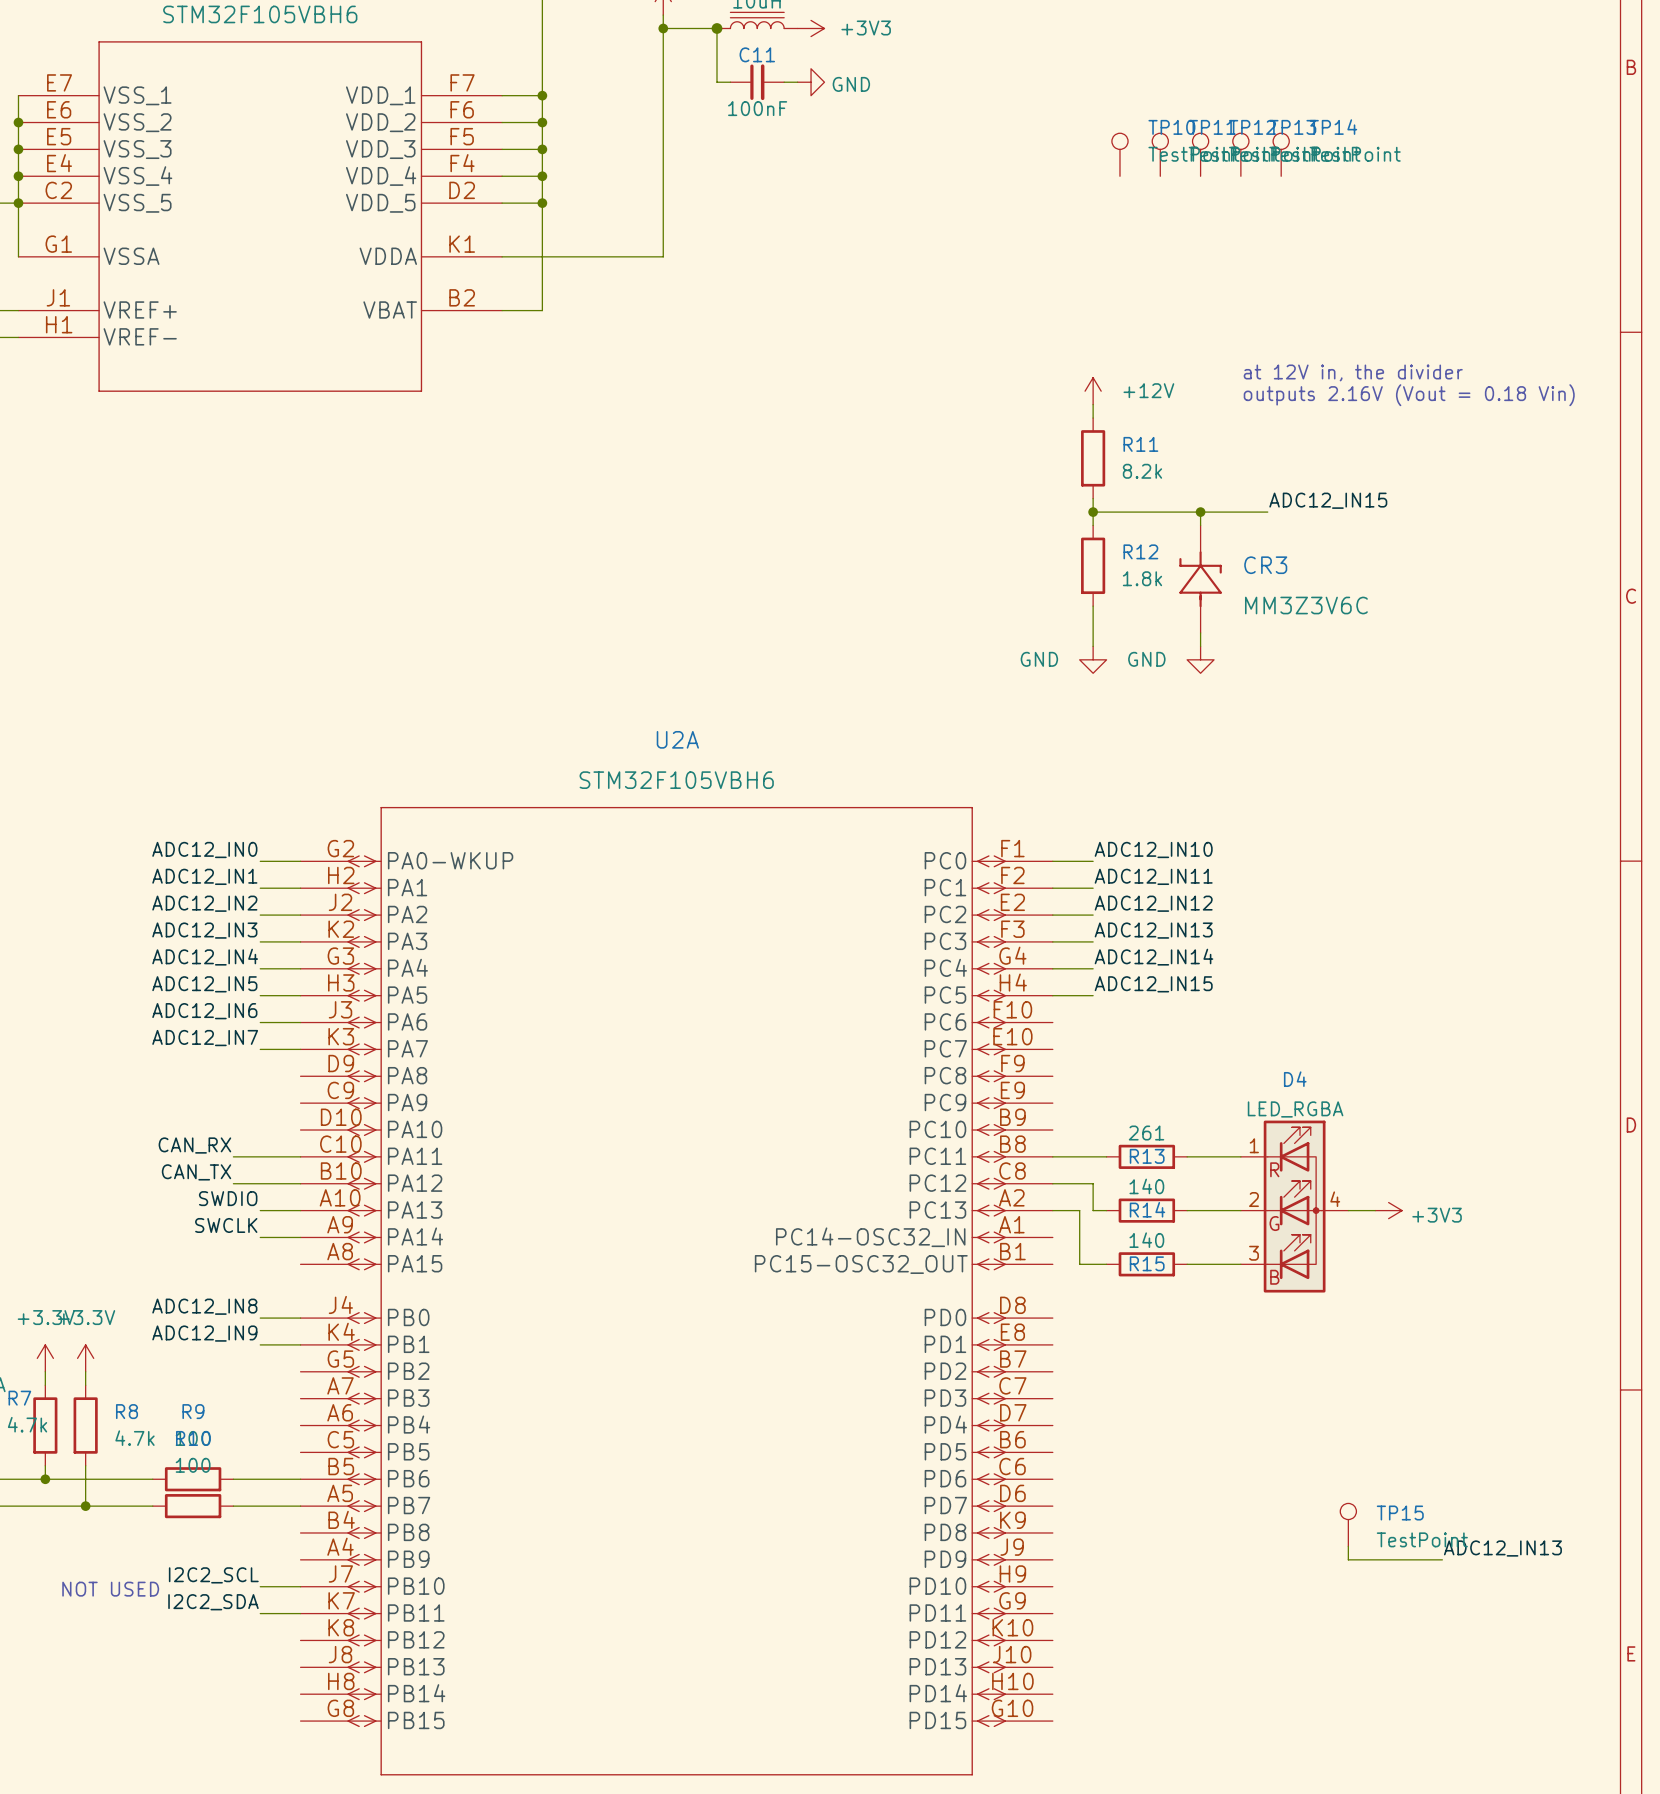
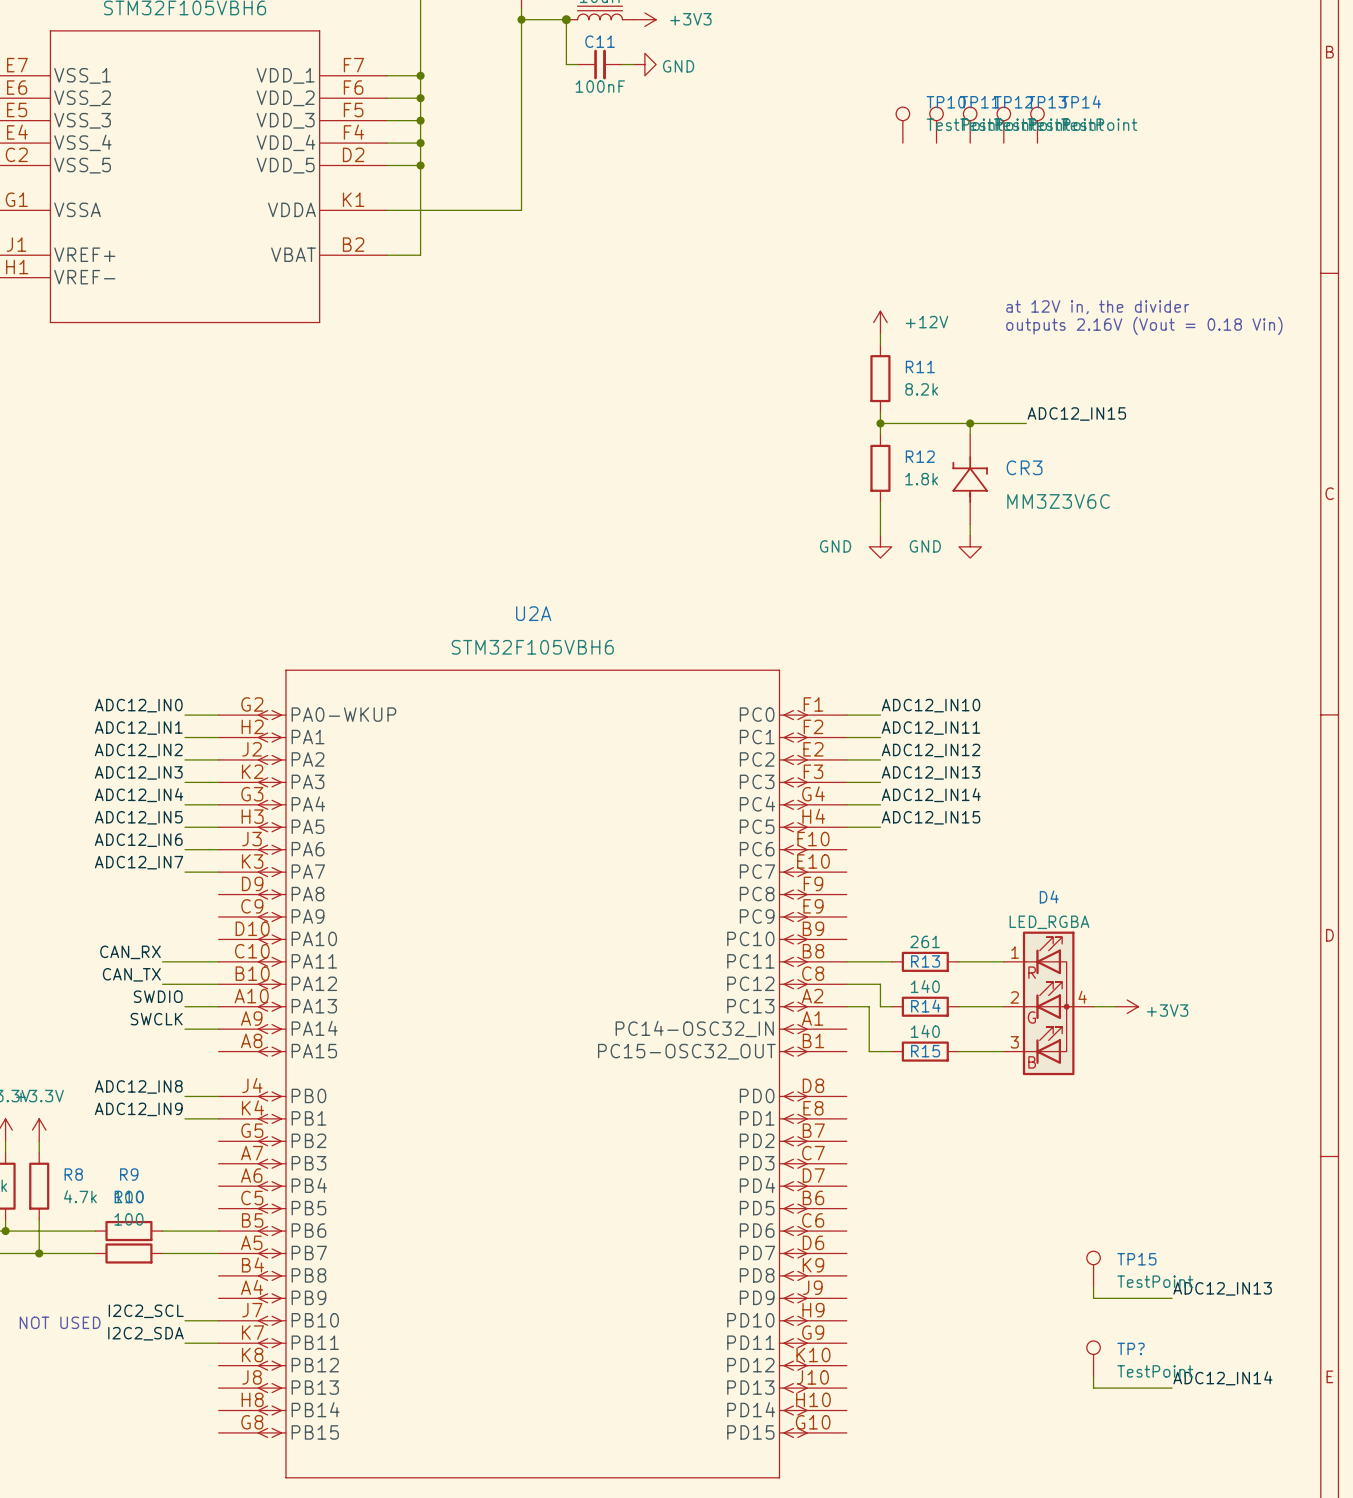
TP?: none -> TestPoint (1093, 1358)
wire: none -> (1093, 1376) (1093, 1388) (1172, 1388)
label: none -> ADC12_IN14 (1222, 1378)

